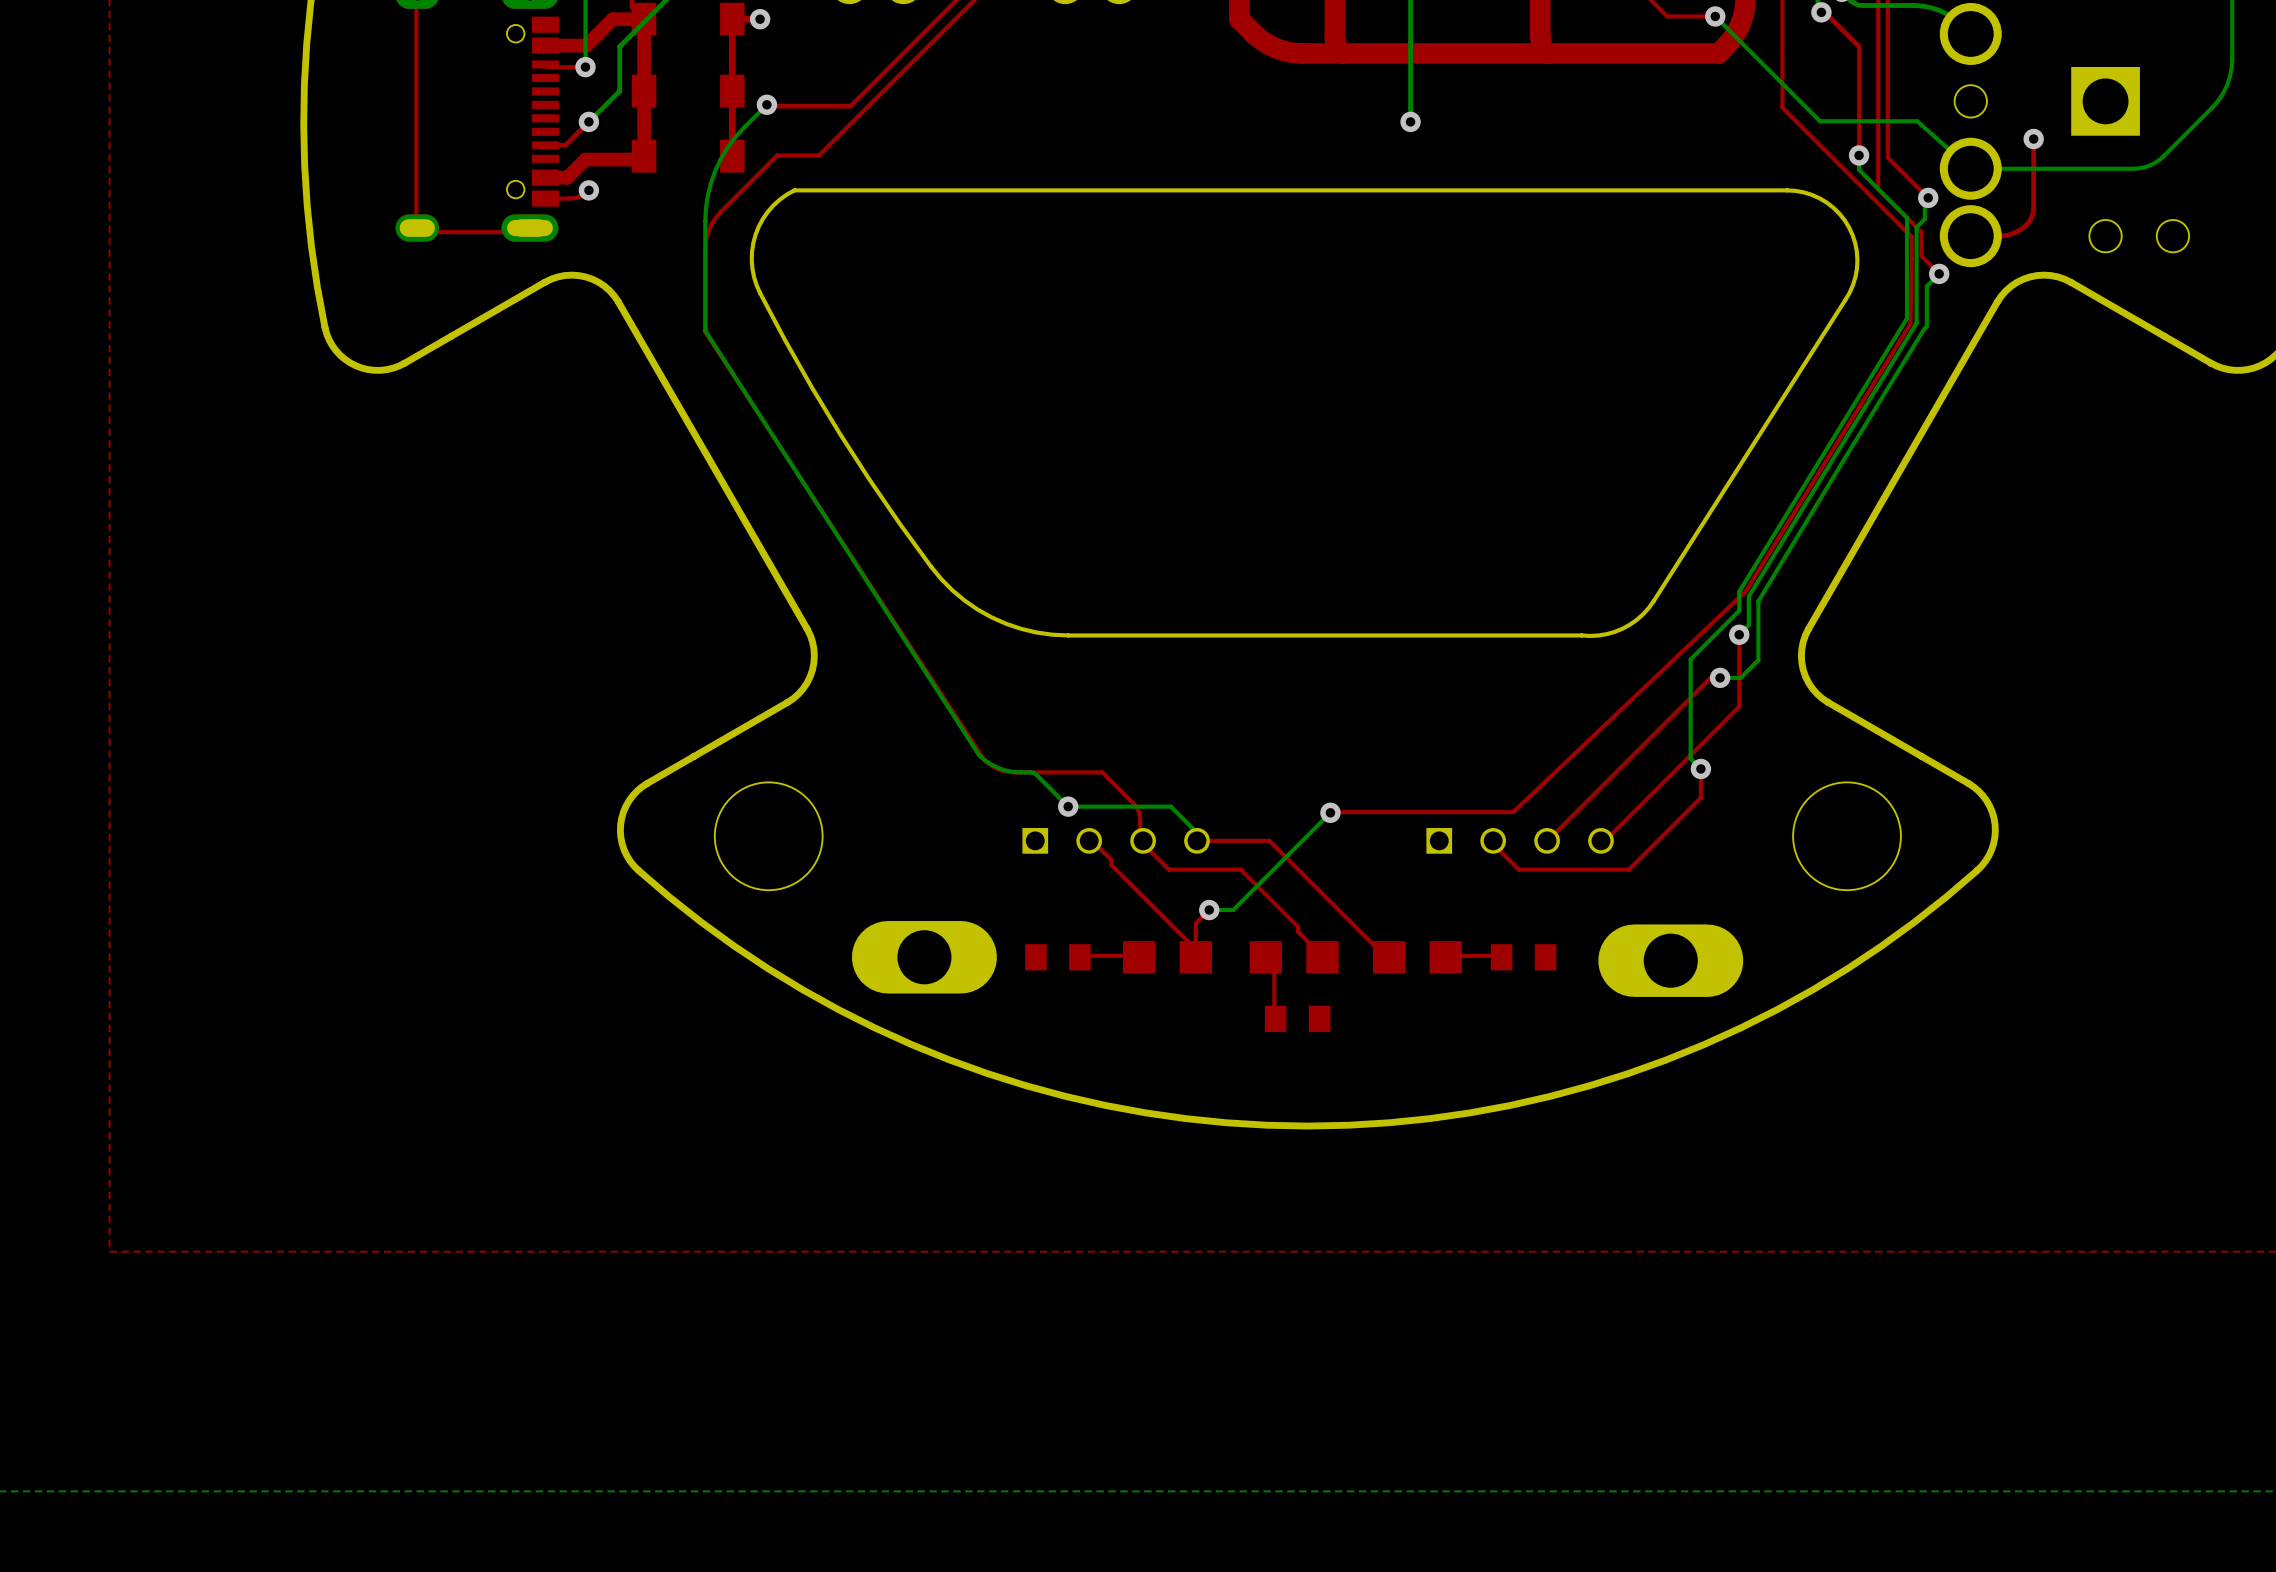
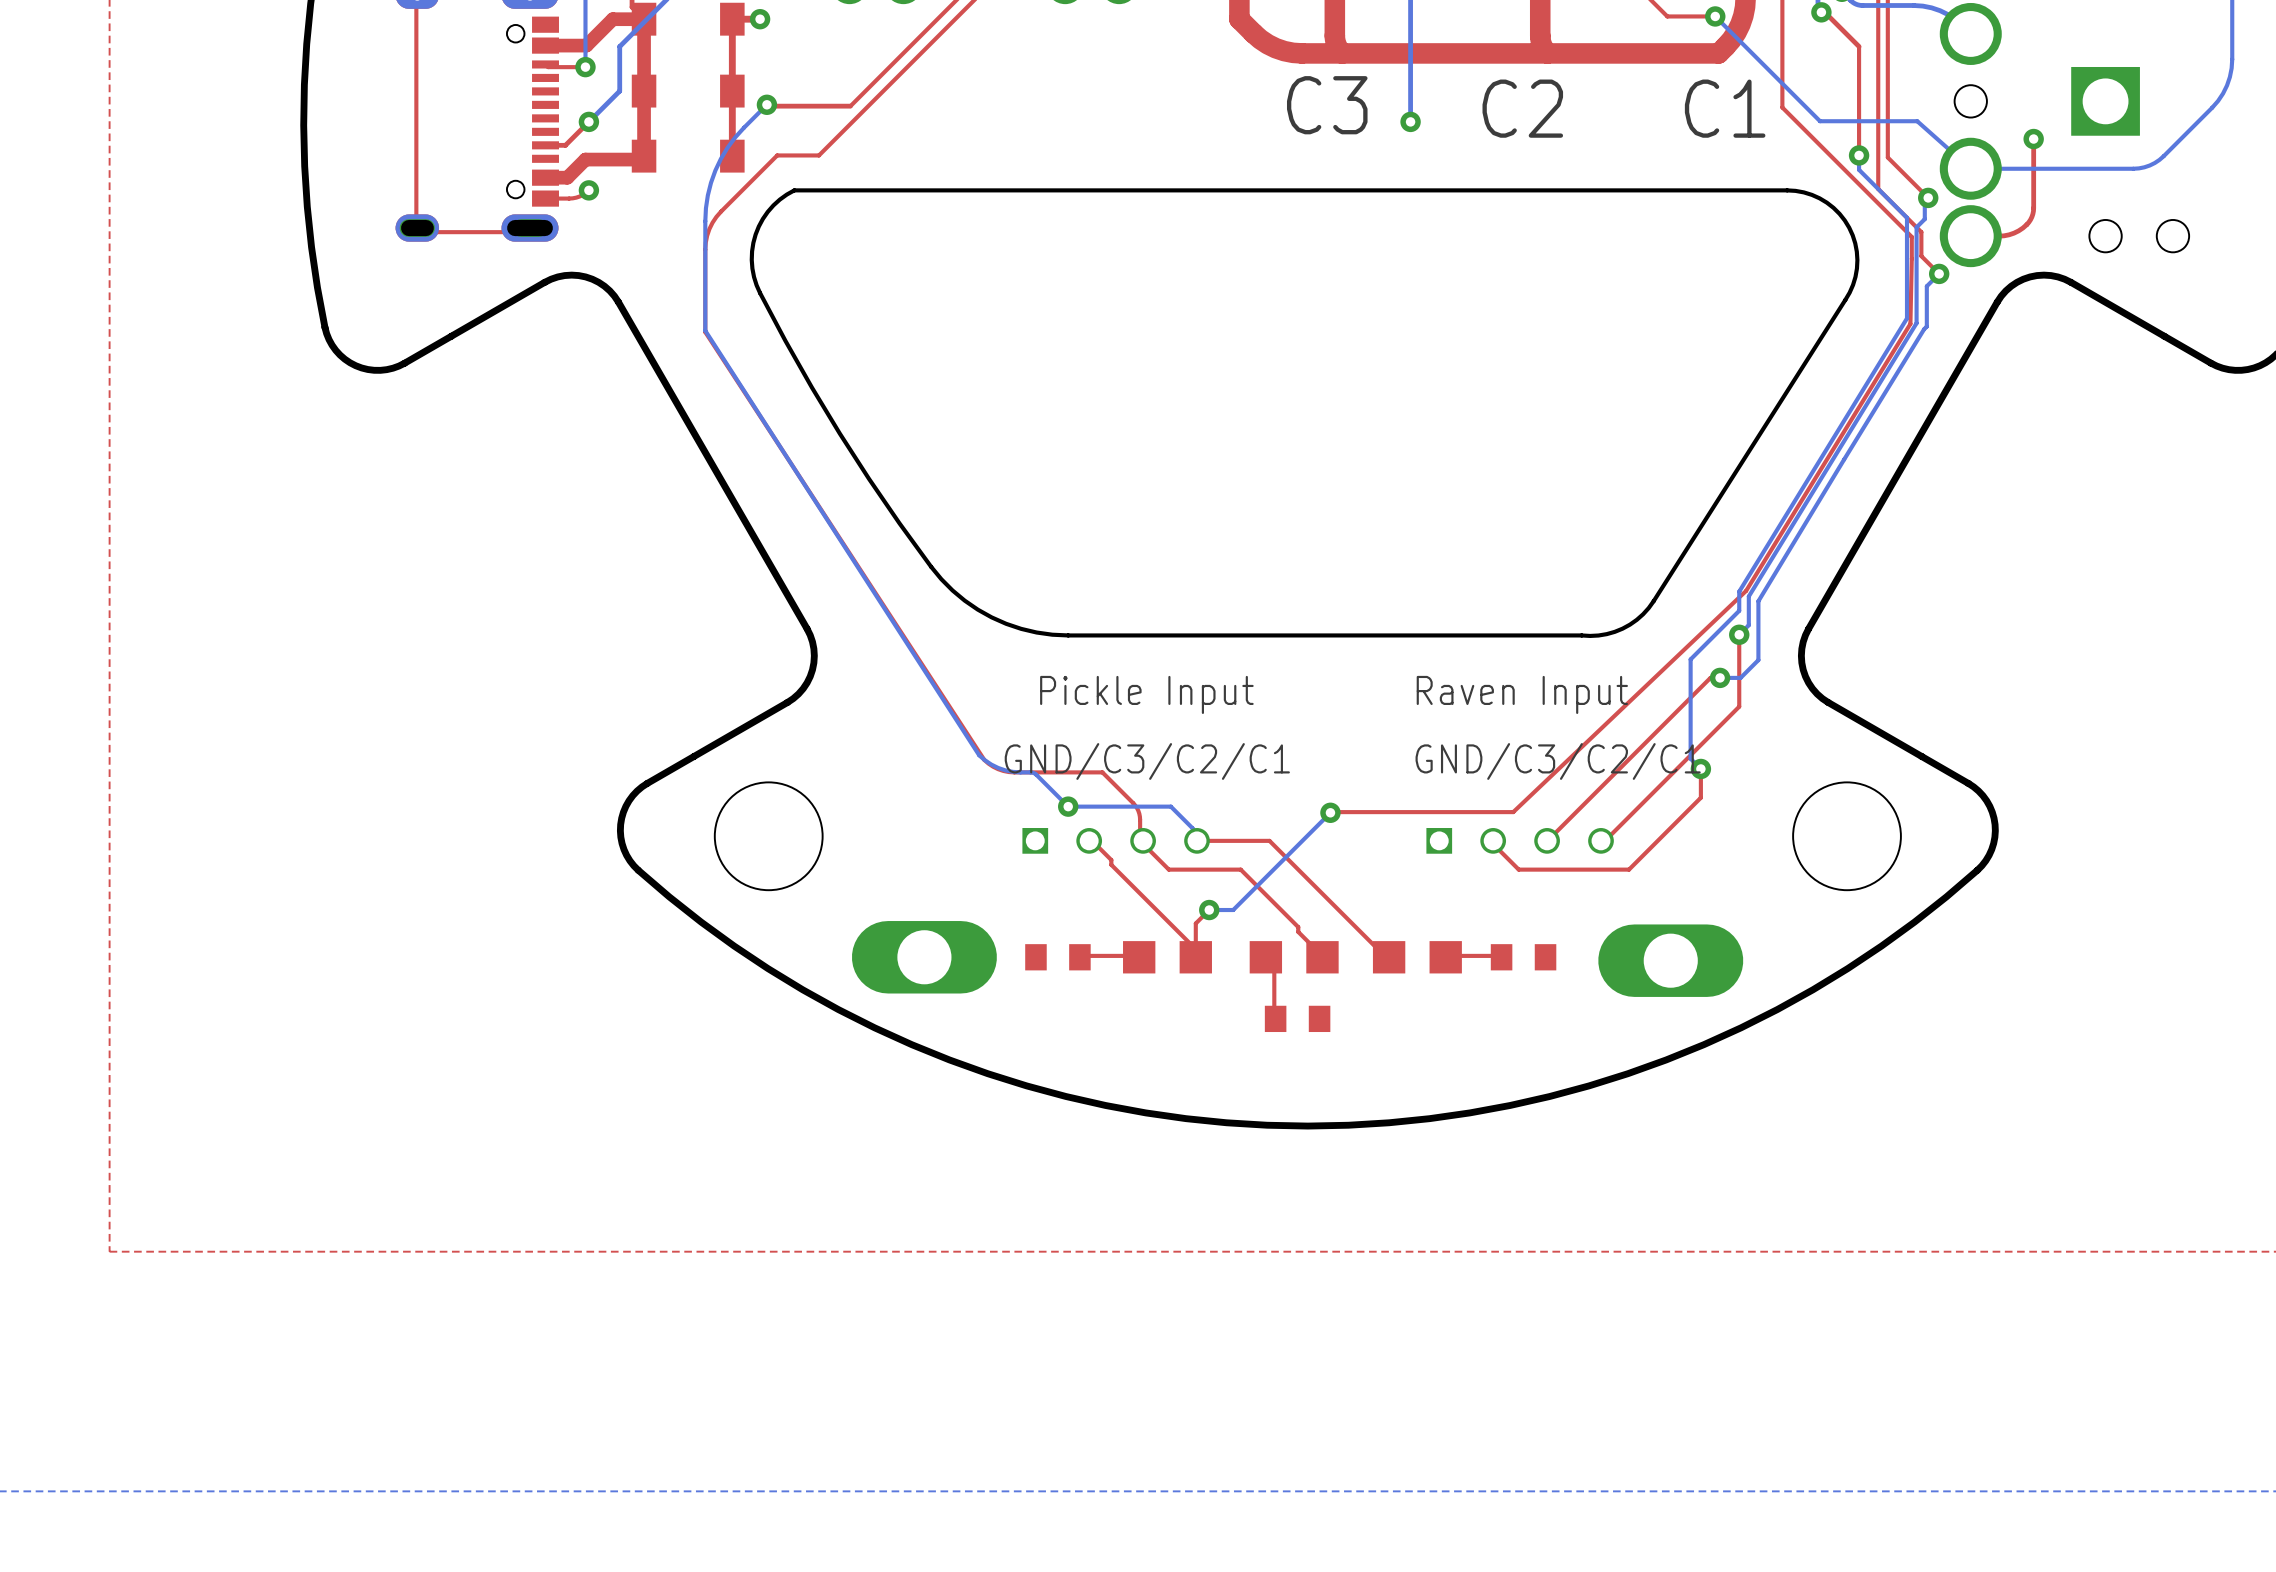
text: none -> C3 (1327, 105)
text: none -> C2 (1522, 108)
text: none -> C1 (1725, 108)
text: none -> Pickle Input (1146, 694)
text: none -> Raven Input (1522, 694)
text: none -> GND/C3/C2/C1 (1147, 761)
text: none -> GND/C3/C2/C1 (1558, 761)

